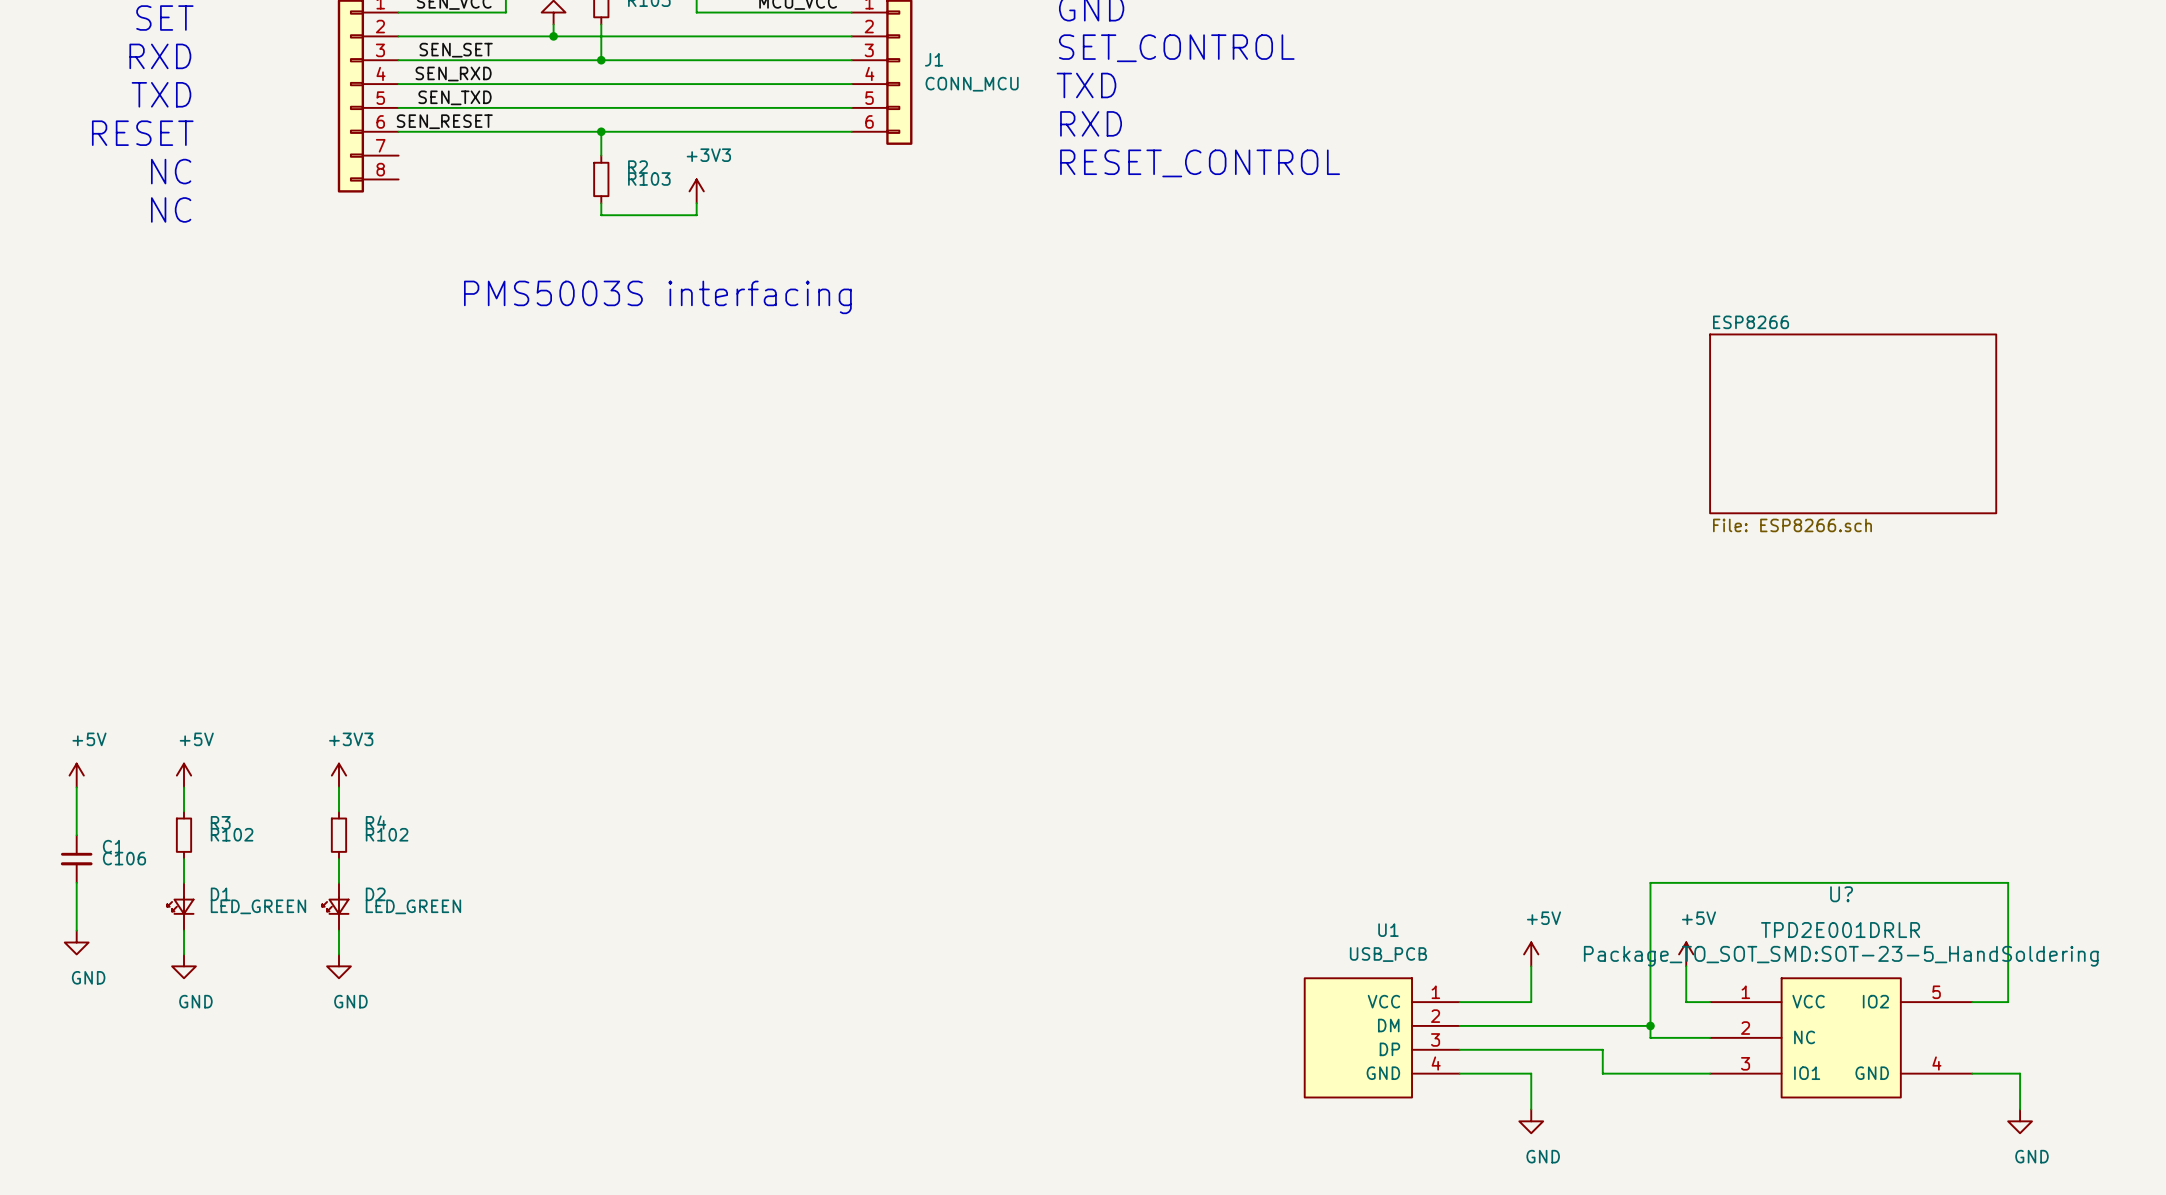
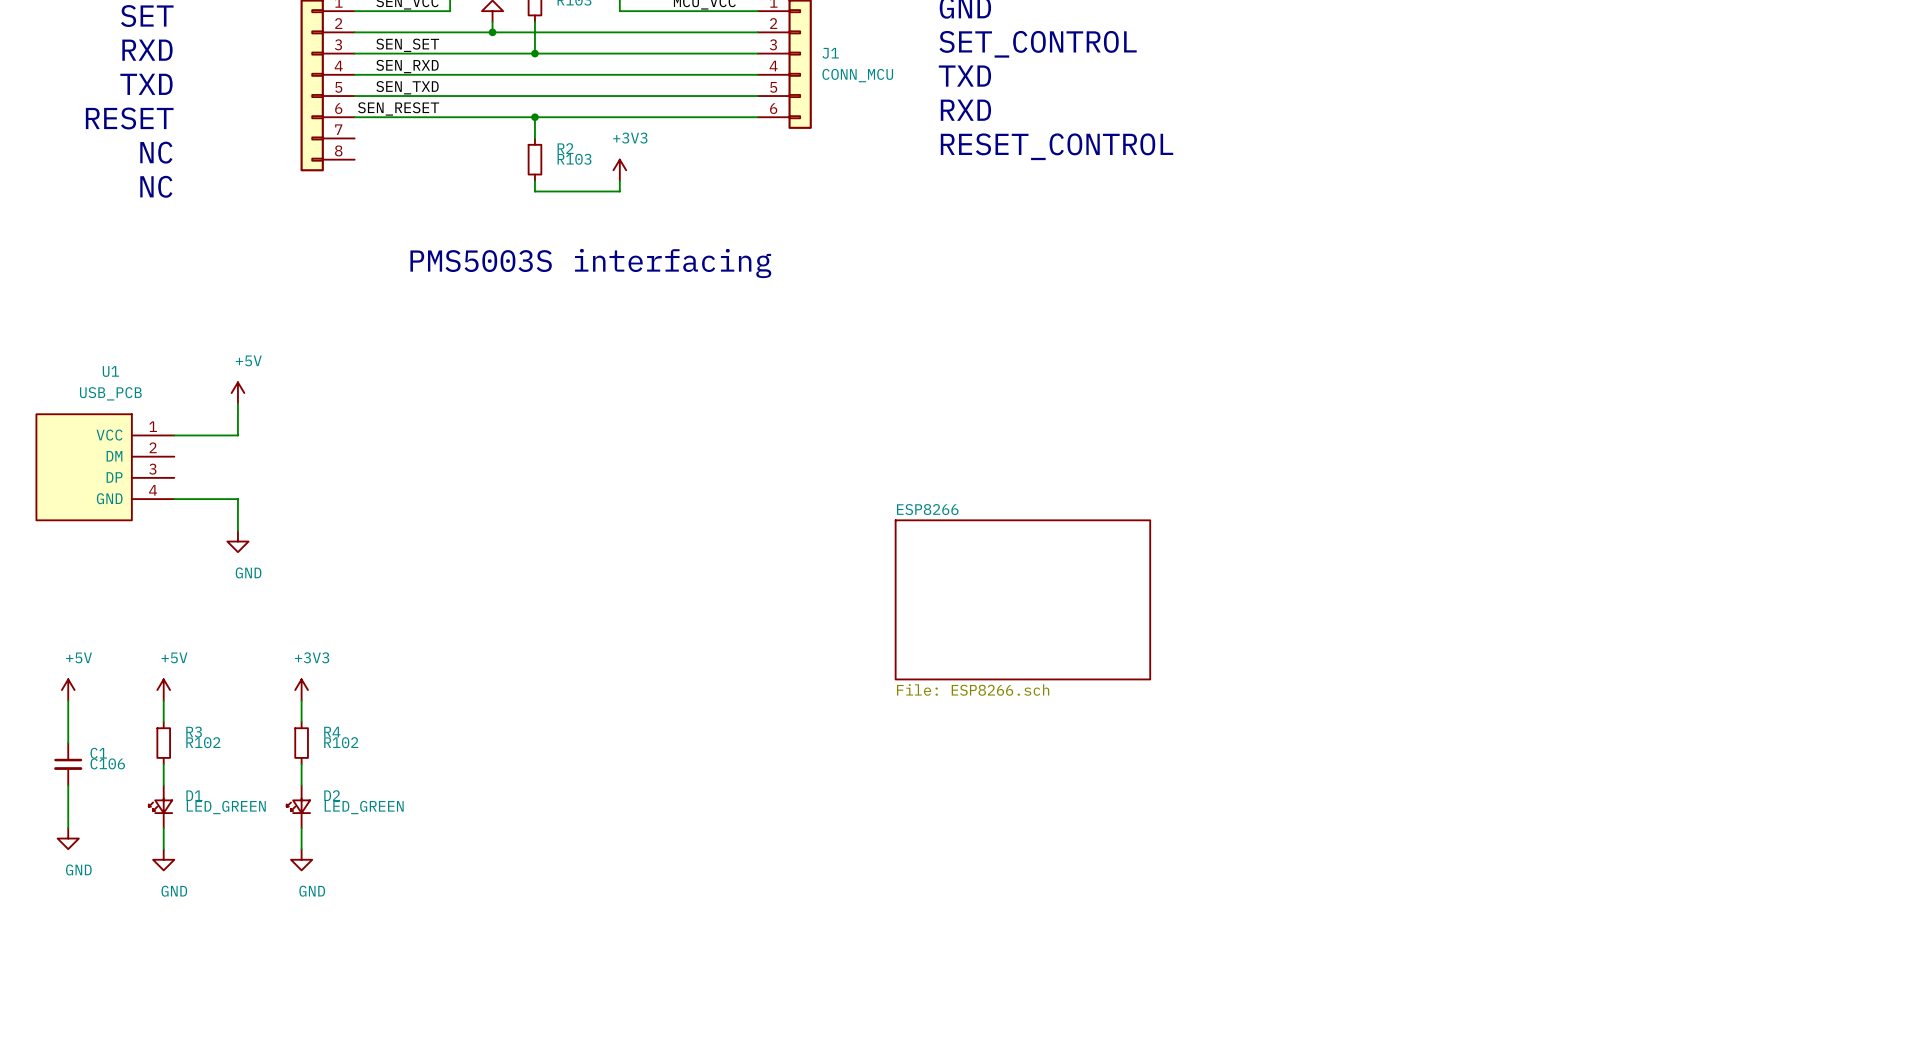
sheet ESP8266 position: (1853, 423) -> (1022, 599)
power symbol: none -> +5V (237, 393)
wire: none -> (237, 403) (237, 435) (174, 435)
wire: none -> (174, 499) (237, 499) (237, 530)
power symbol: none -> GND (237, 541)
power symbol: +5V (1531, 954) -> none
power symbol: +5V (1686, 954) -> none
wire: (1531, 966) (1531, 1002) (1459, 1002) -> none
wire: (1686, 966) (1686, 1002) (1710, 1002) -> none
wire: (1972, 1002) (2008, 1002) (2008, 882) (1650, 882) (1650, 1037) (1710, 1037) -> none
wire: (1459, 1025) (1650, 1025) -> none
junction: (1650, 1025) -> none
U1 position: (1382, 1037) -> (105, 467)
U?: TPD2E001DRLR (1841, 1037) -> none
wire: (1459, 1049) (1602, 1049) (1602, 1073) (1710, 1073) -> none
wire: (1459, 1073) (1531, 1073) (1531, 1109) -> none
wire: (1972, 1073) (2020, 1073) (2020, 1109) -> none
power symbol: GND (1531, 1121) -> none
power symbol: GND (2020, 1121) -> none

